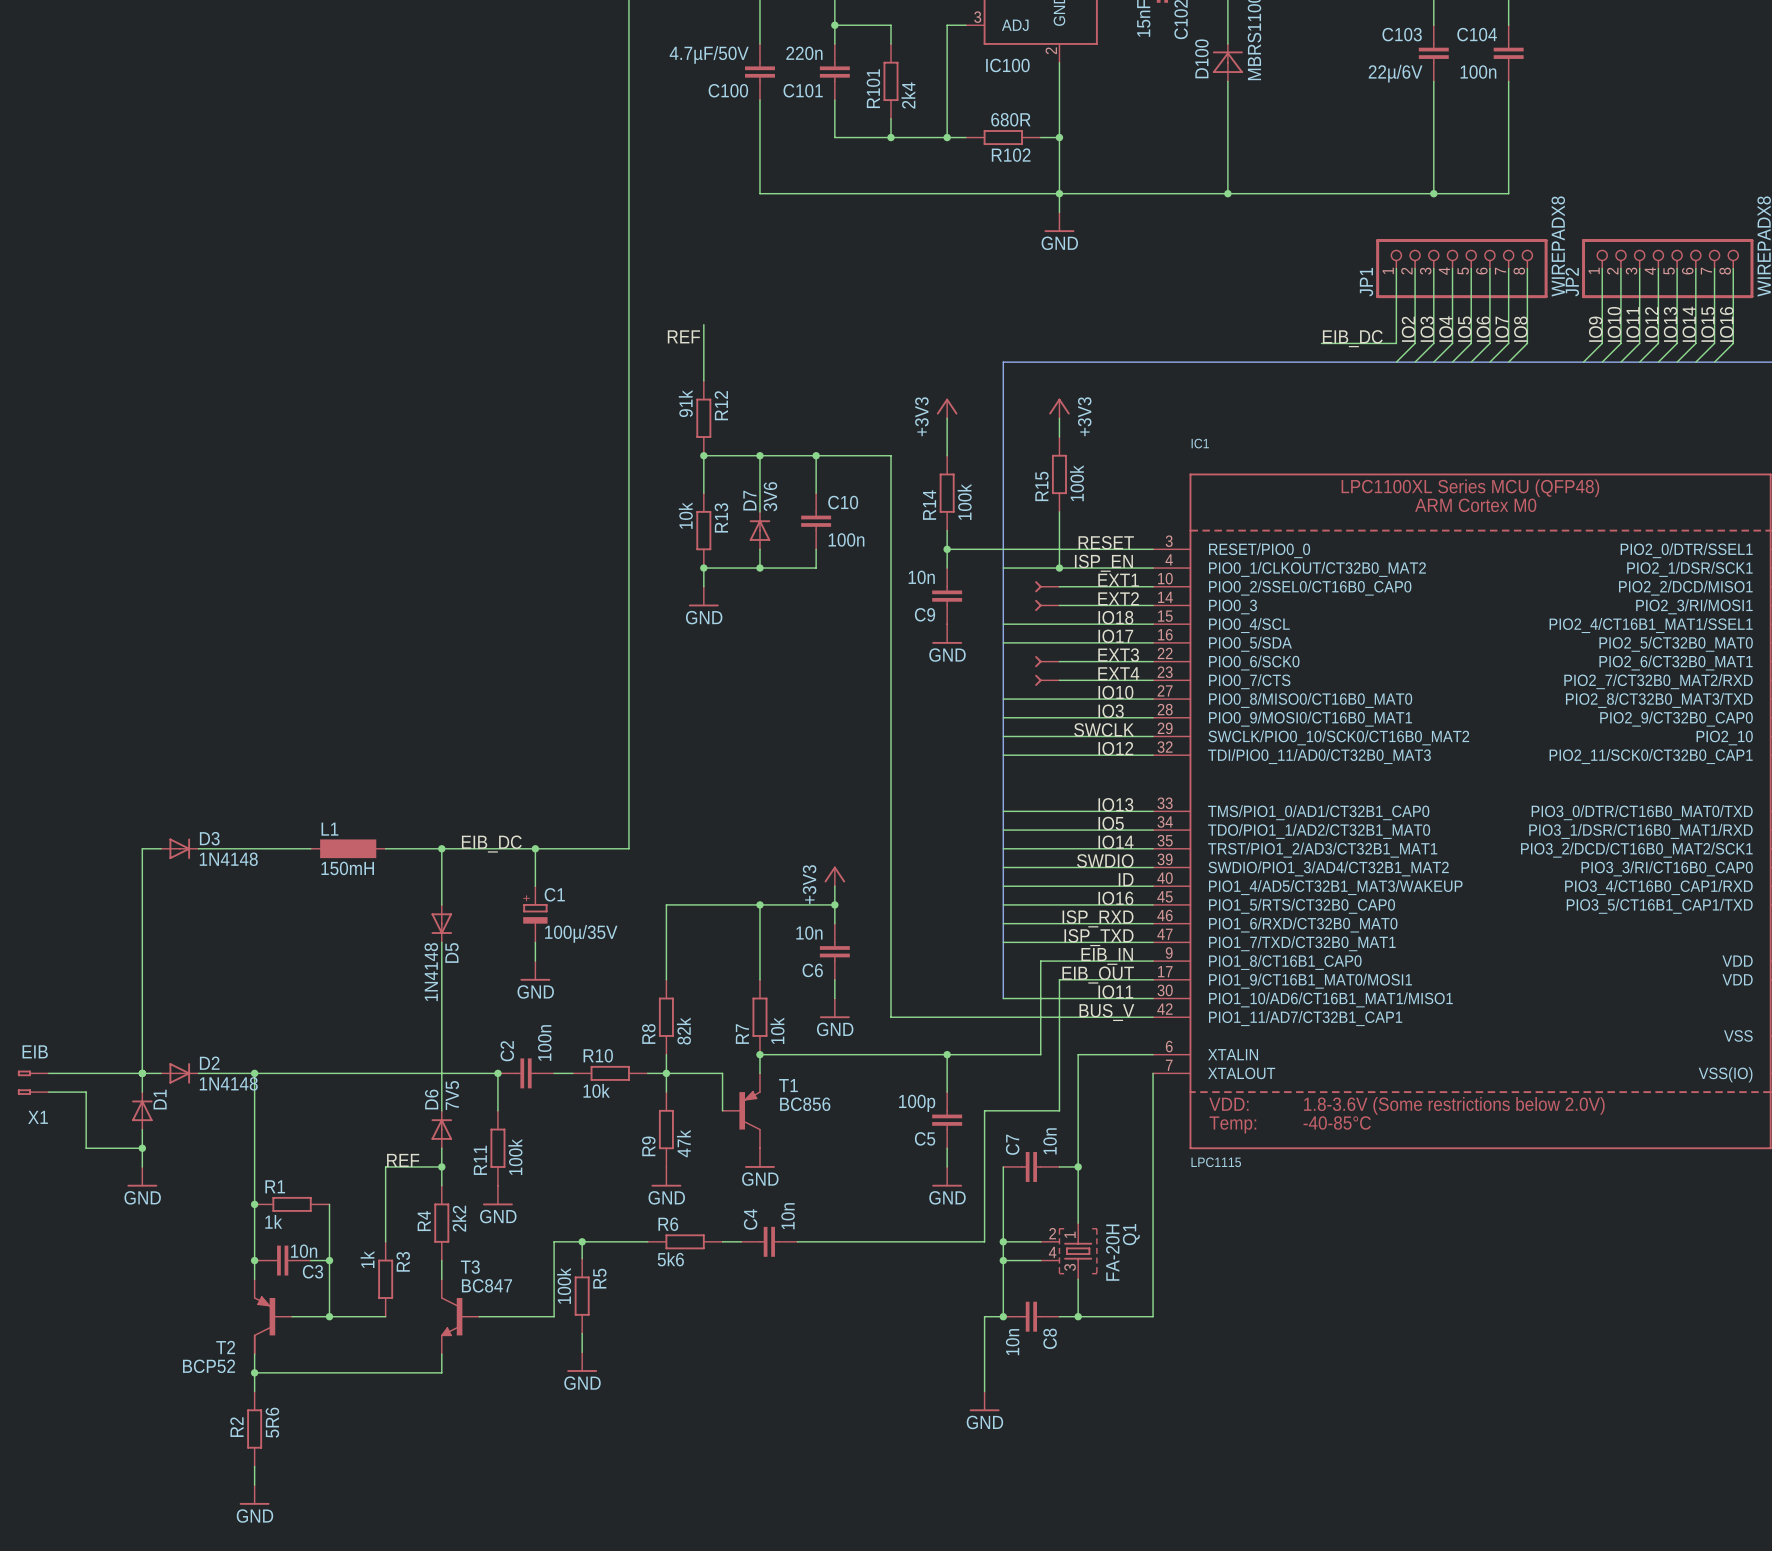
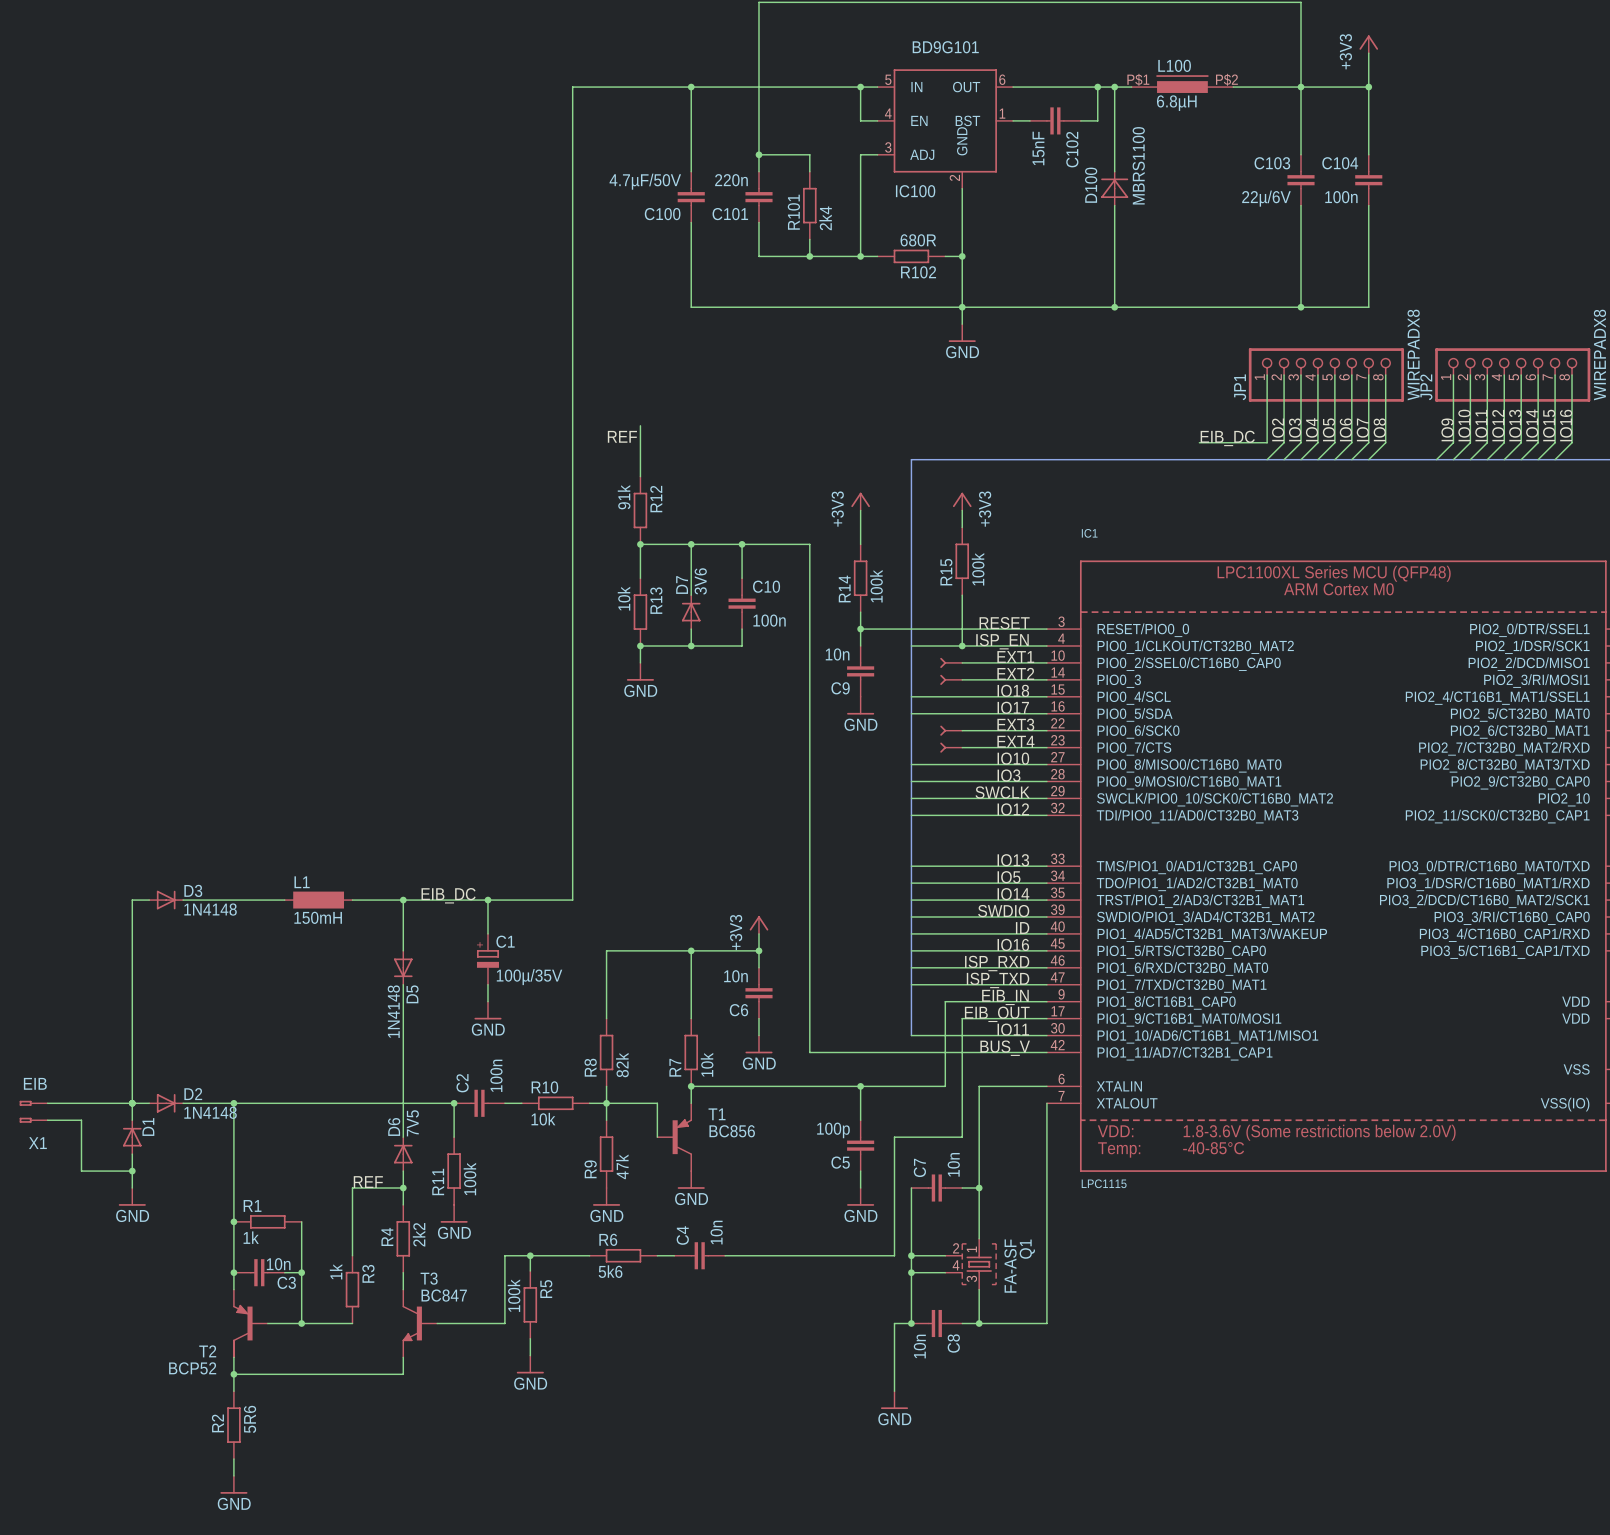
Q1 value: FA-20H (1112, 1252) -> FA-ASF (1010, 1266)

